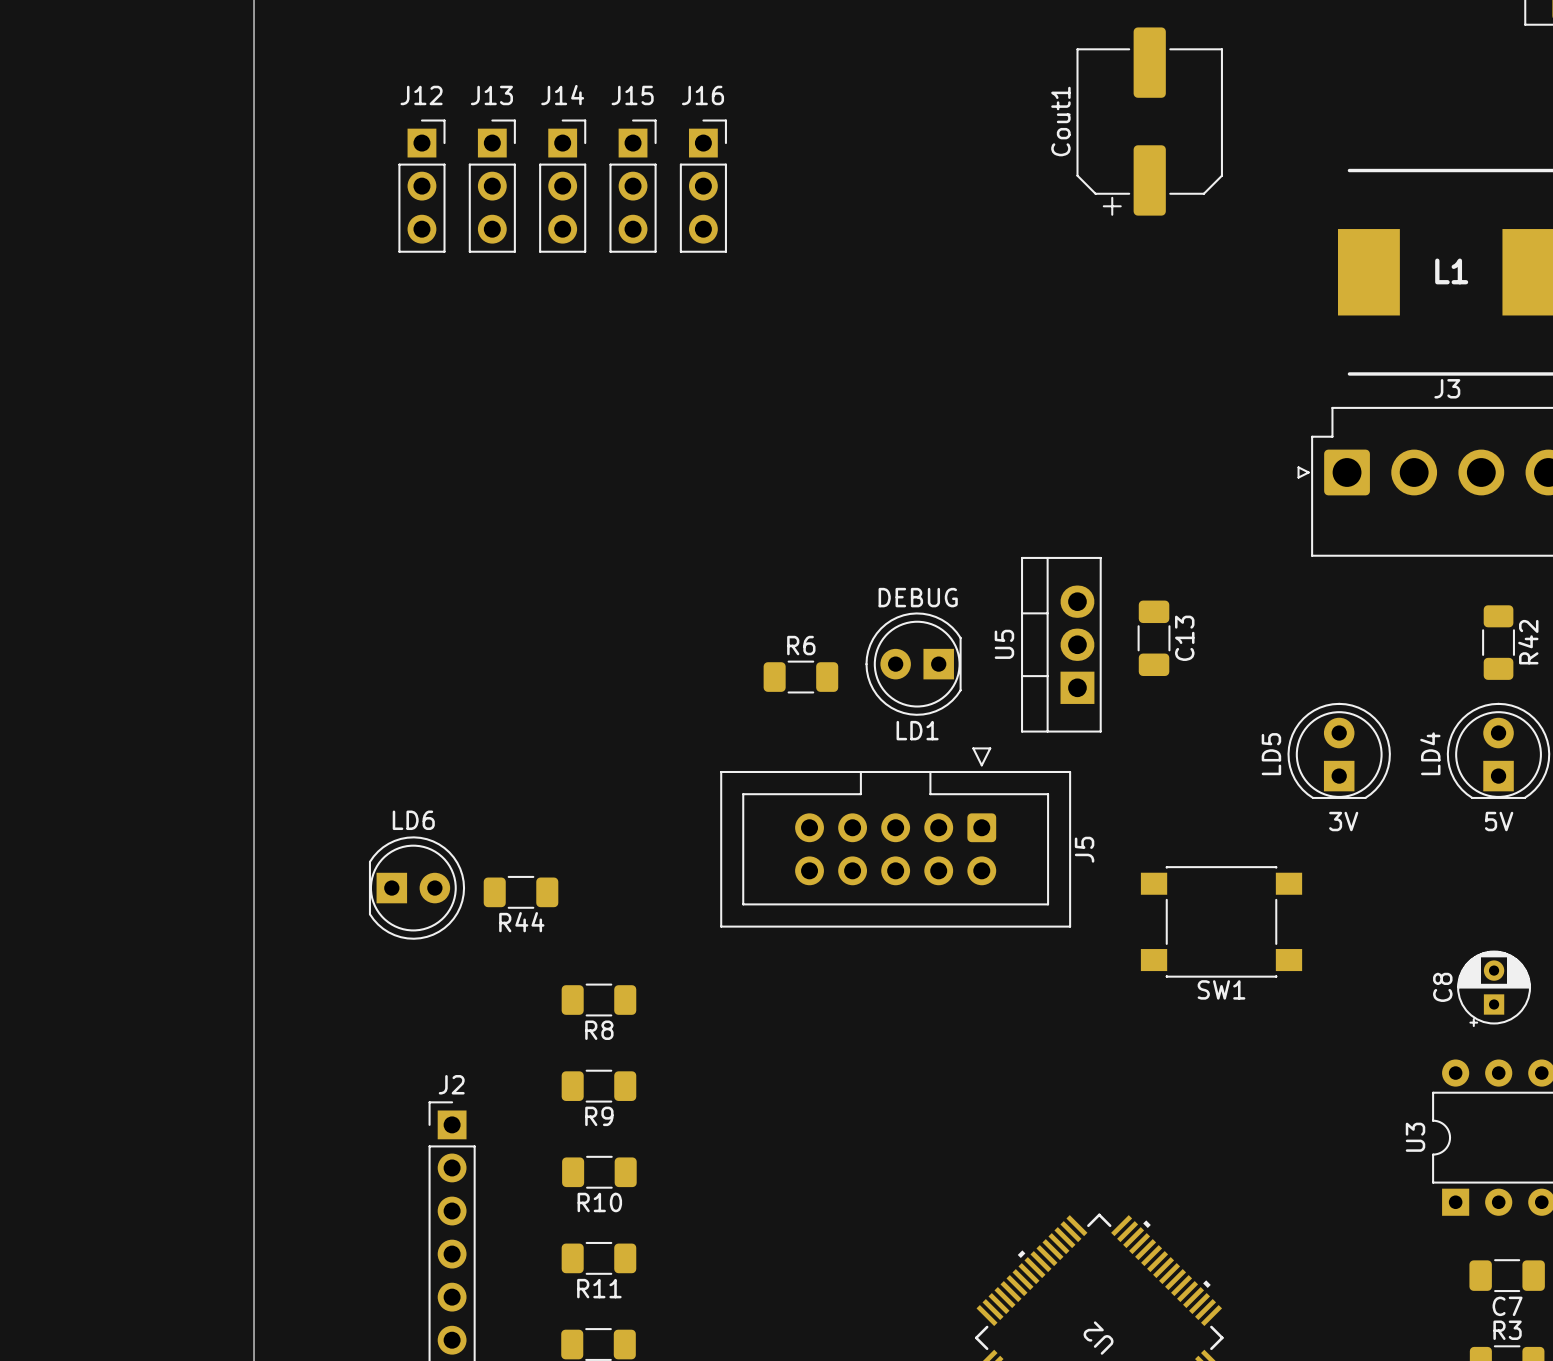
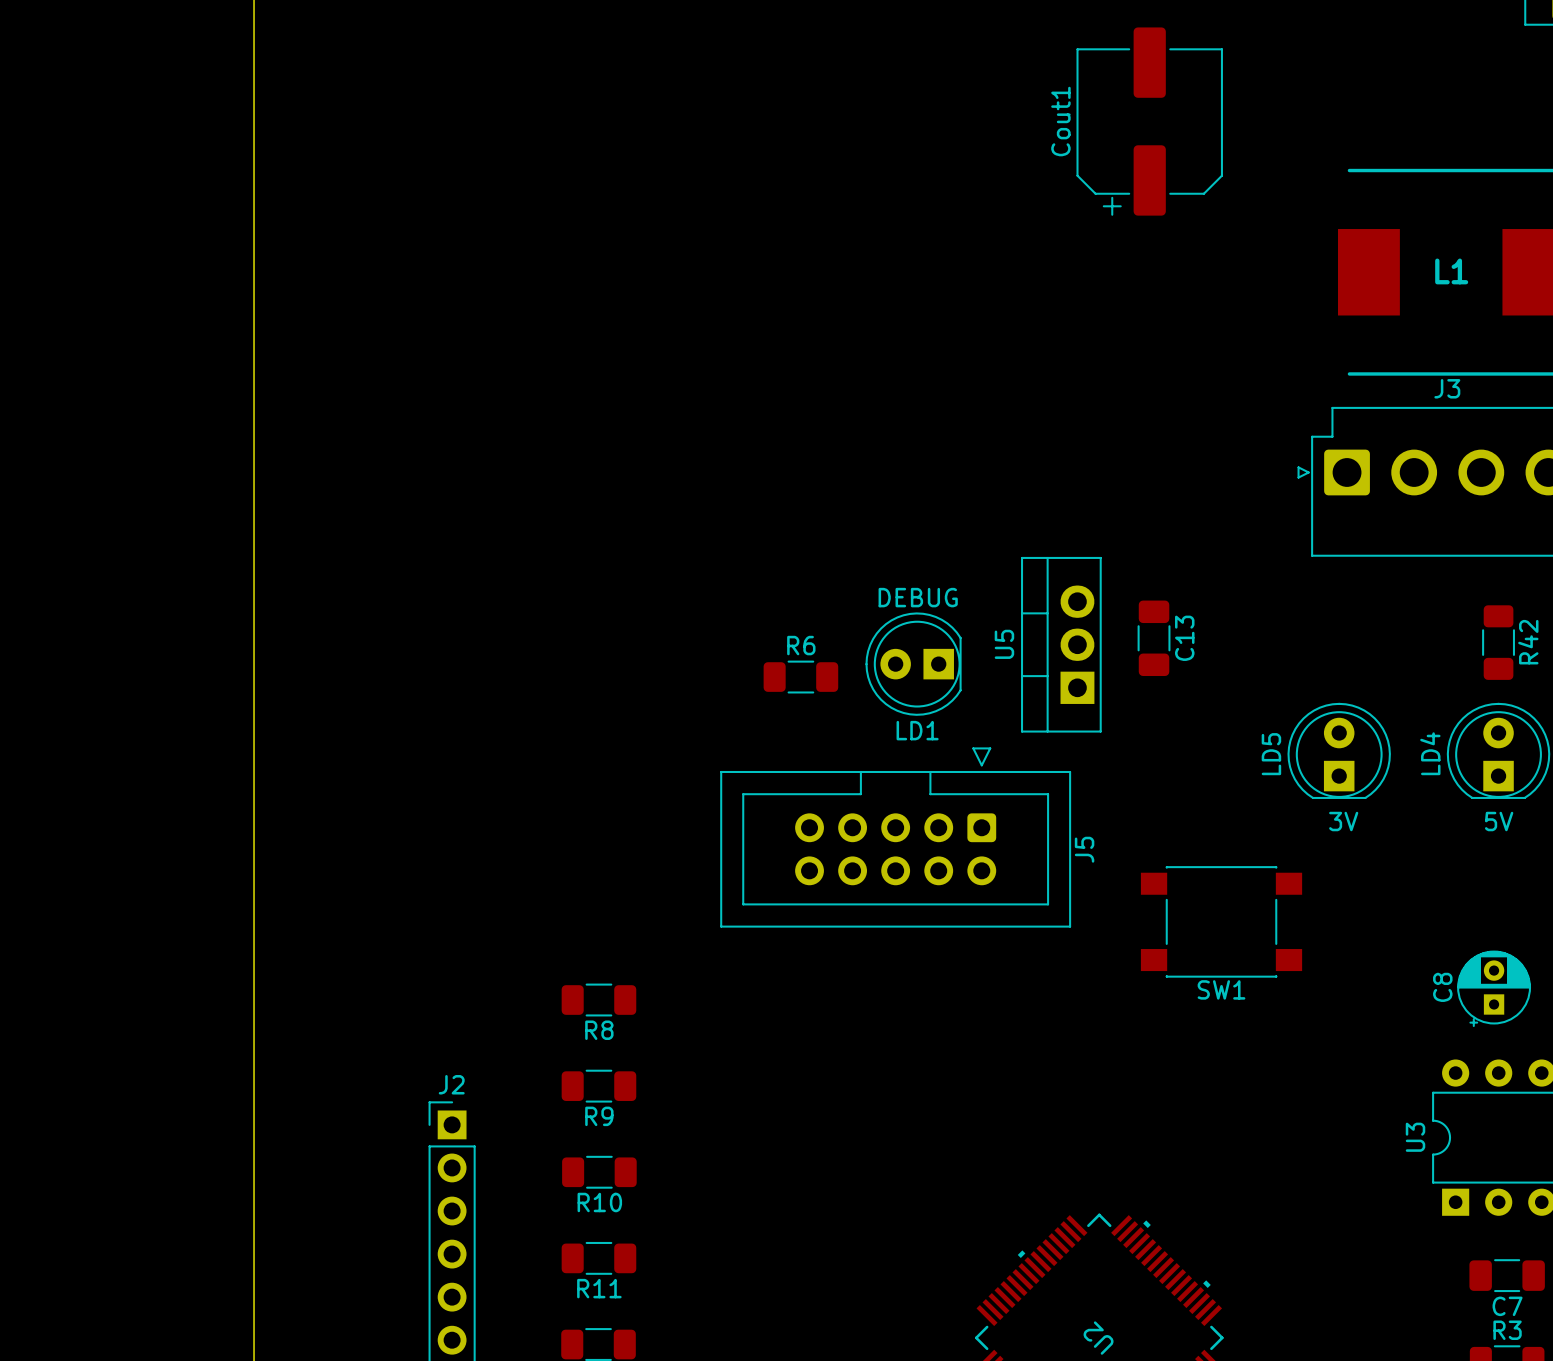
J12: (421, 186) -> none
J13: (492, 186) -> none
J14: (562, 186) -> none
J15: (633, 186) -> none
J16: (703, 186) -> none
LD6: (417, 888) -> none
R44: (521, 892) -> none

